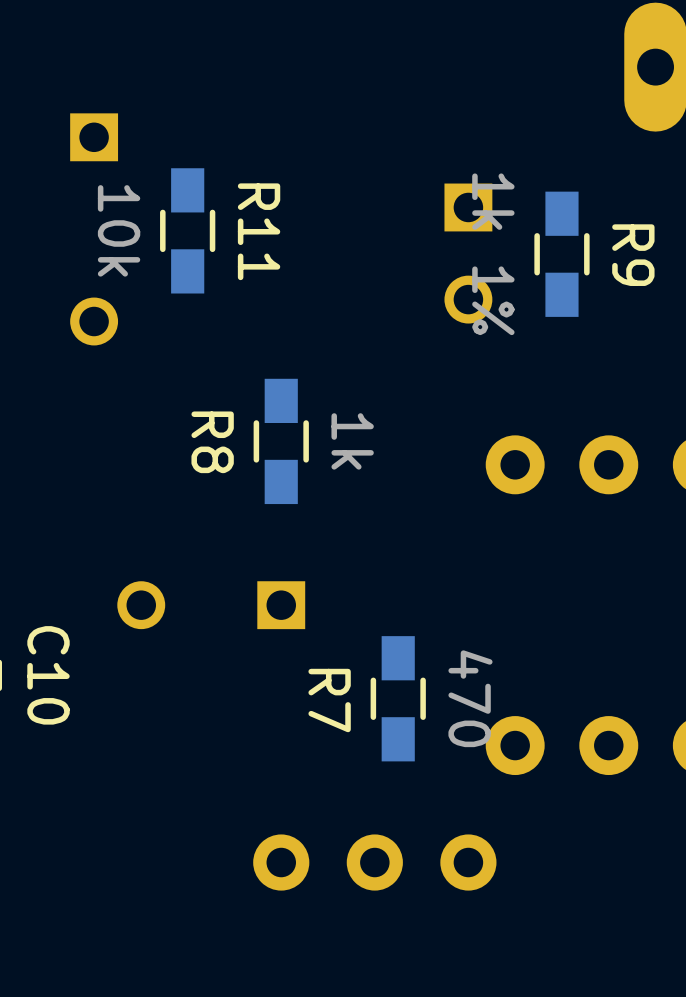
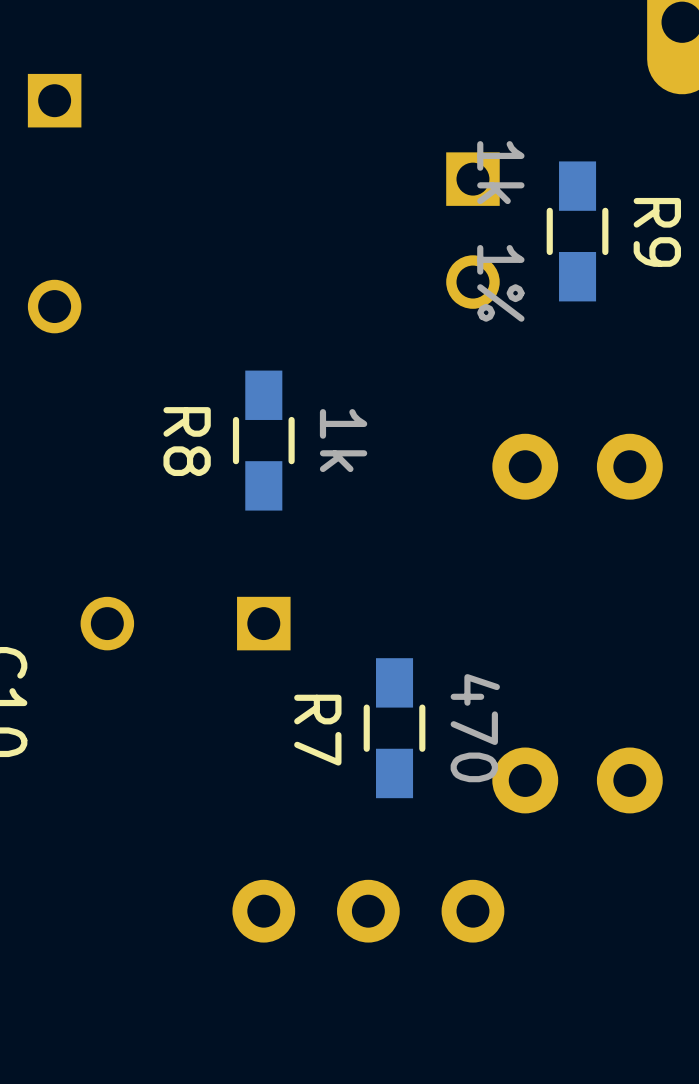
R11: 10k (187, 230) -> none

